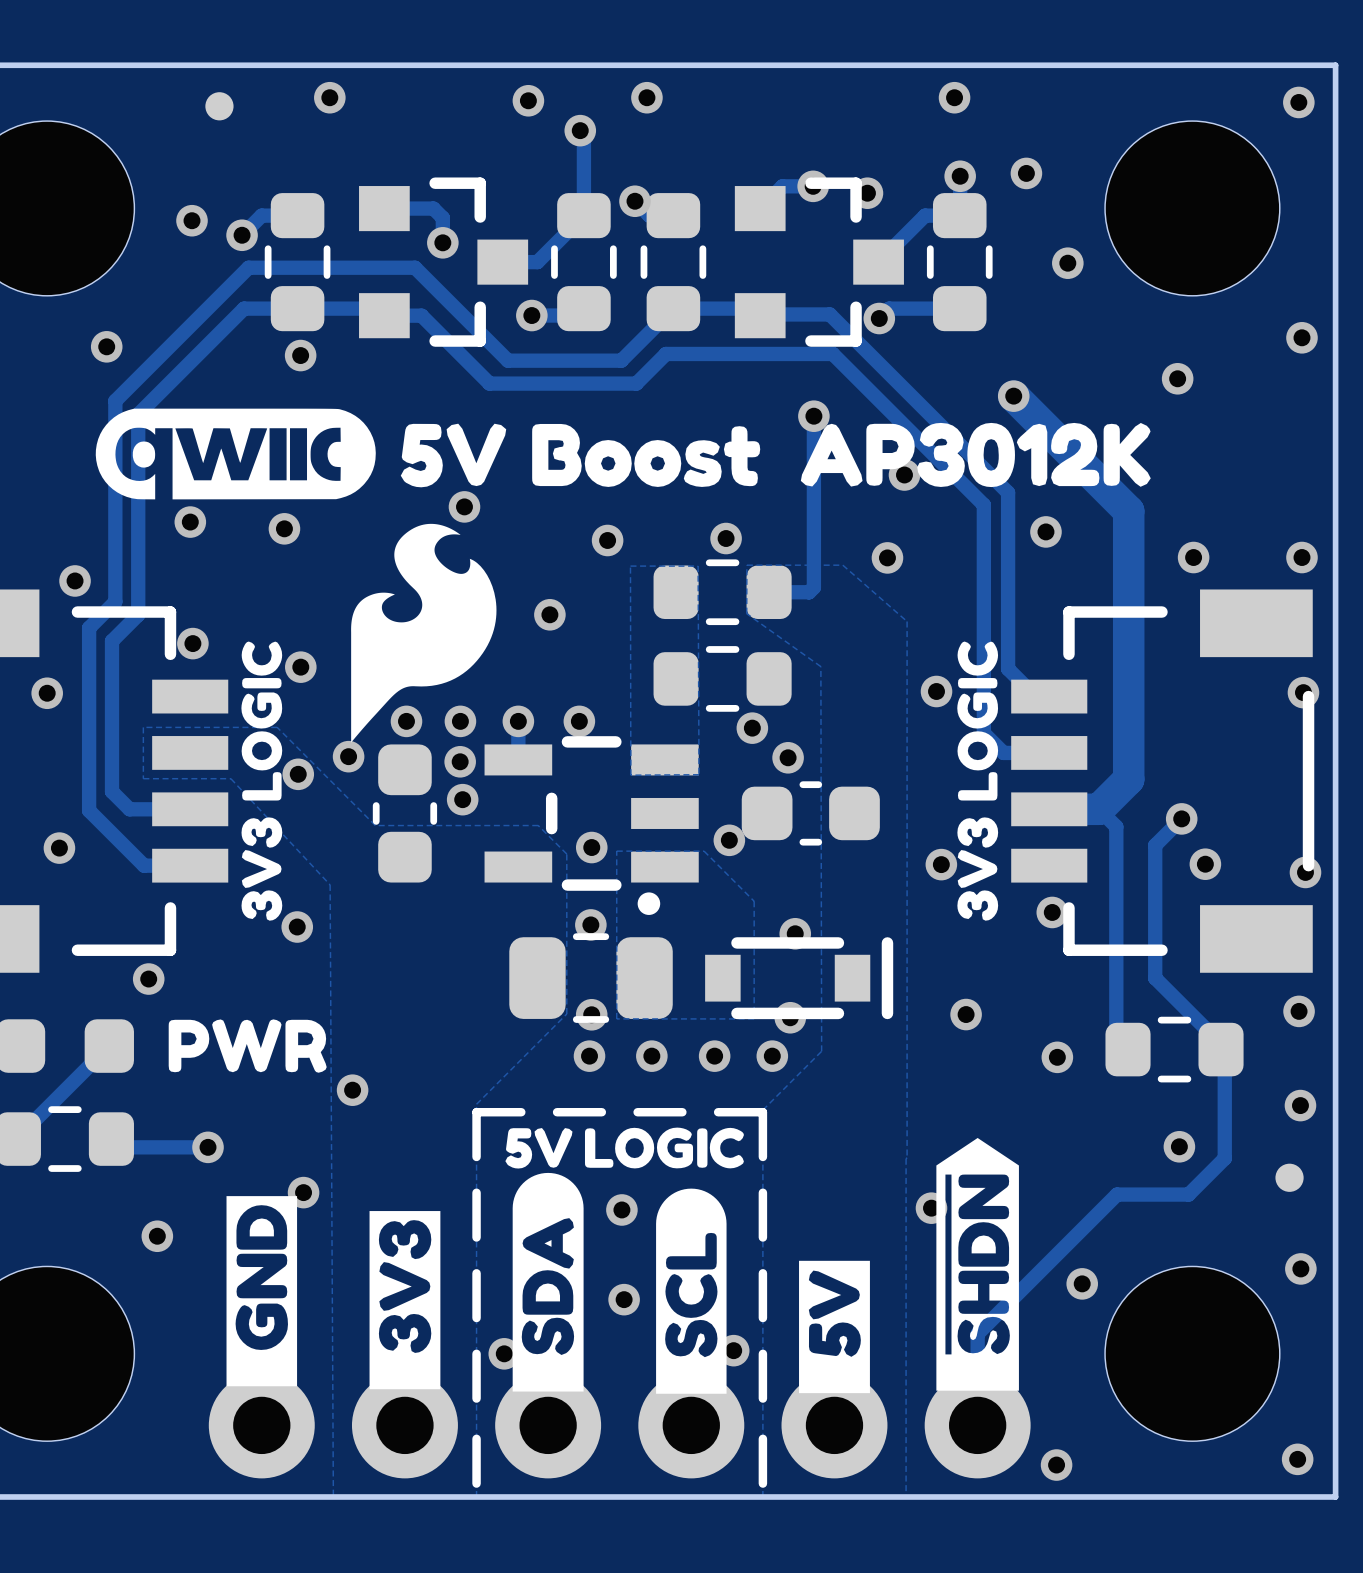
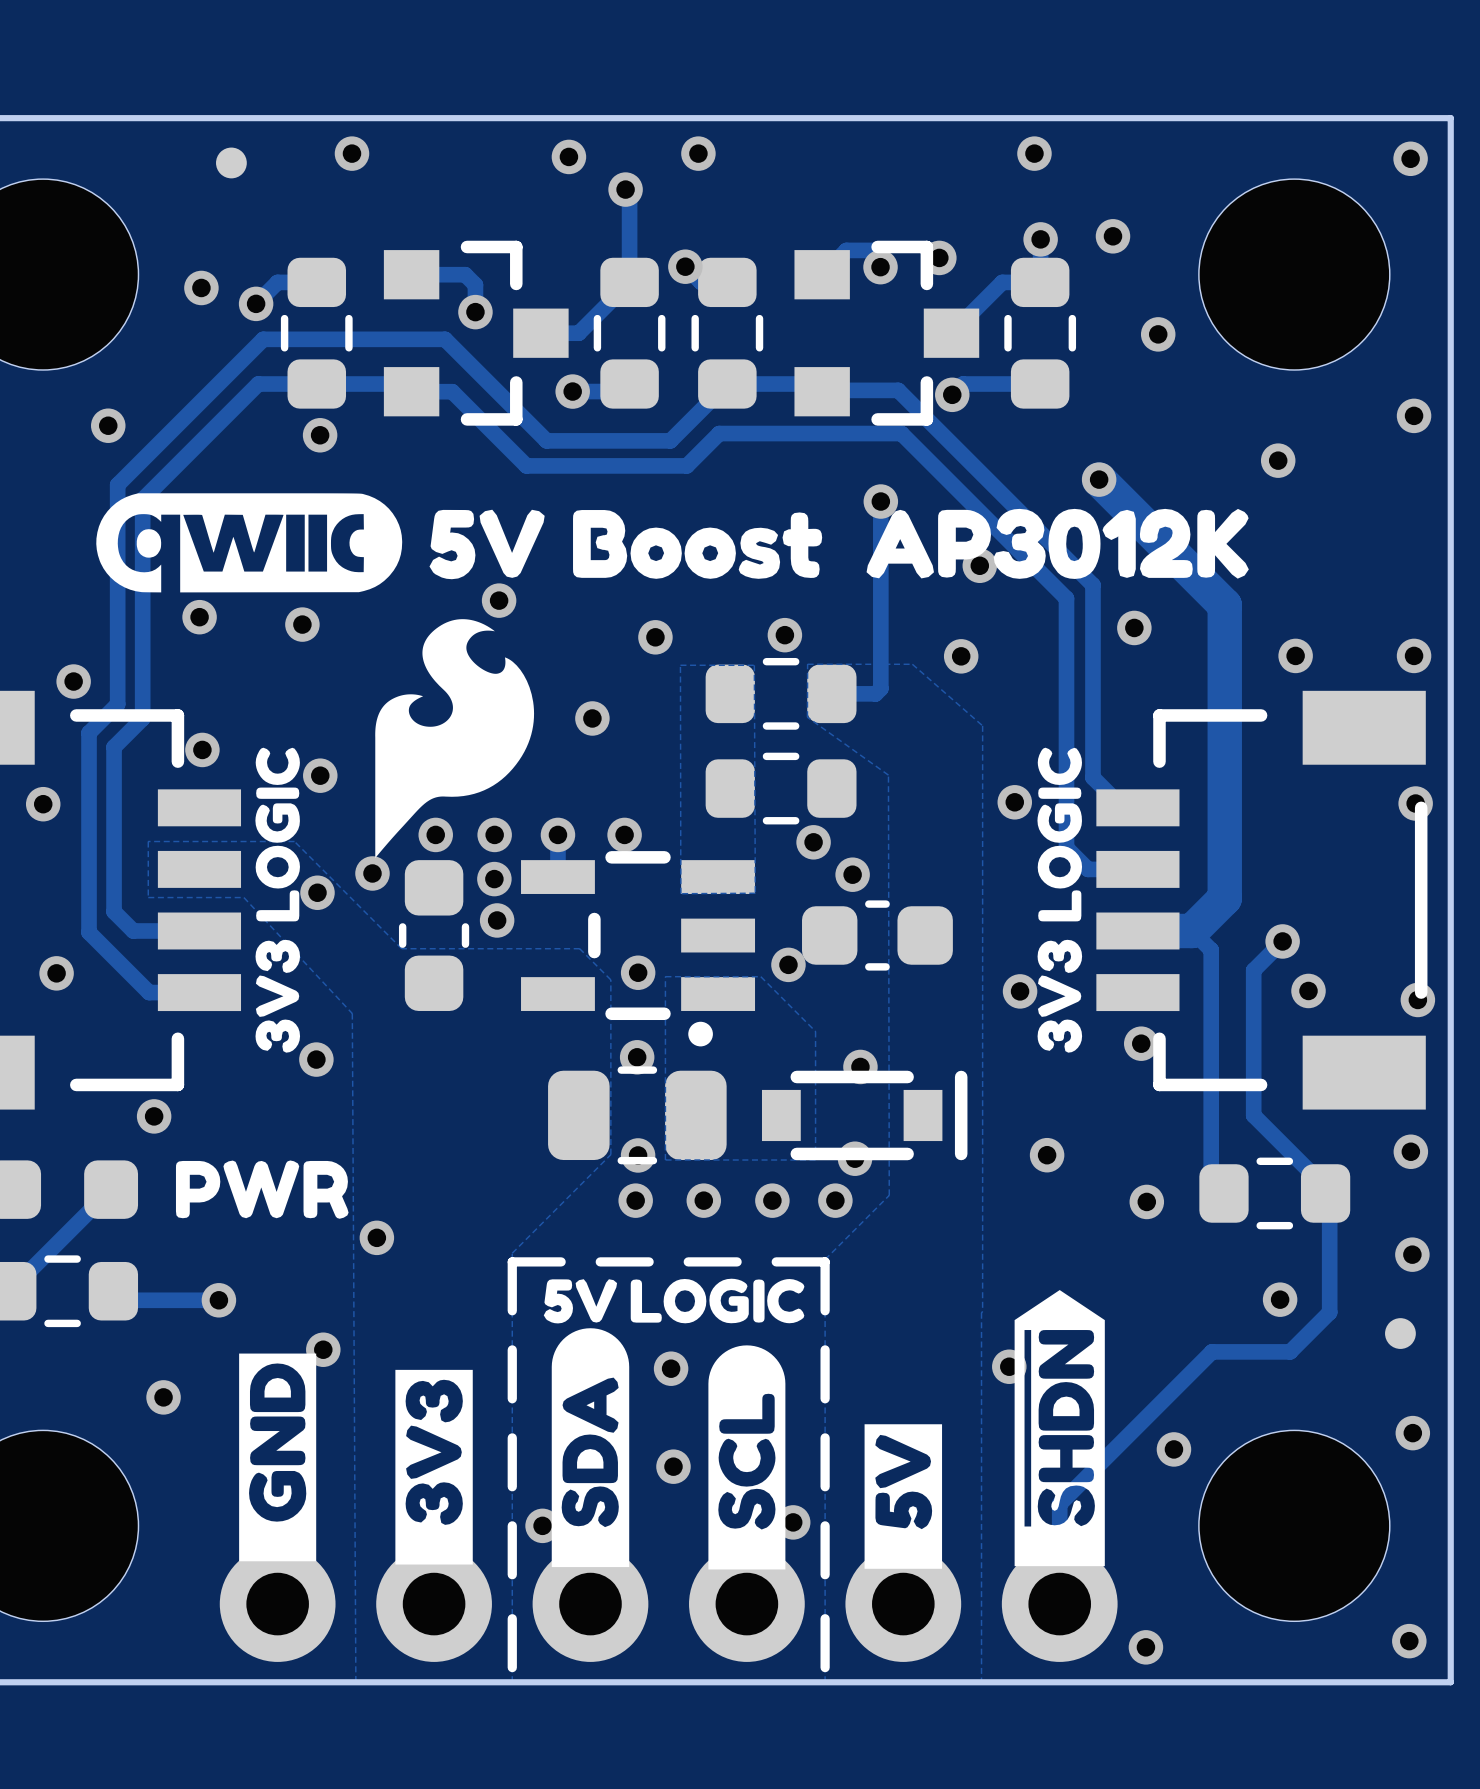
via position: (813, 186) -> (880, 267)

